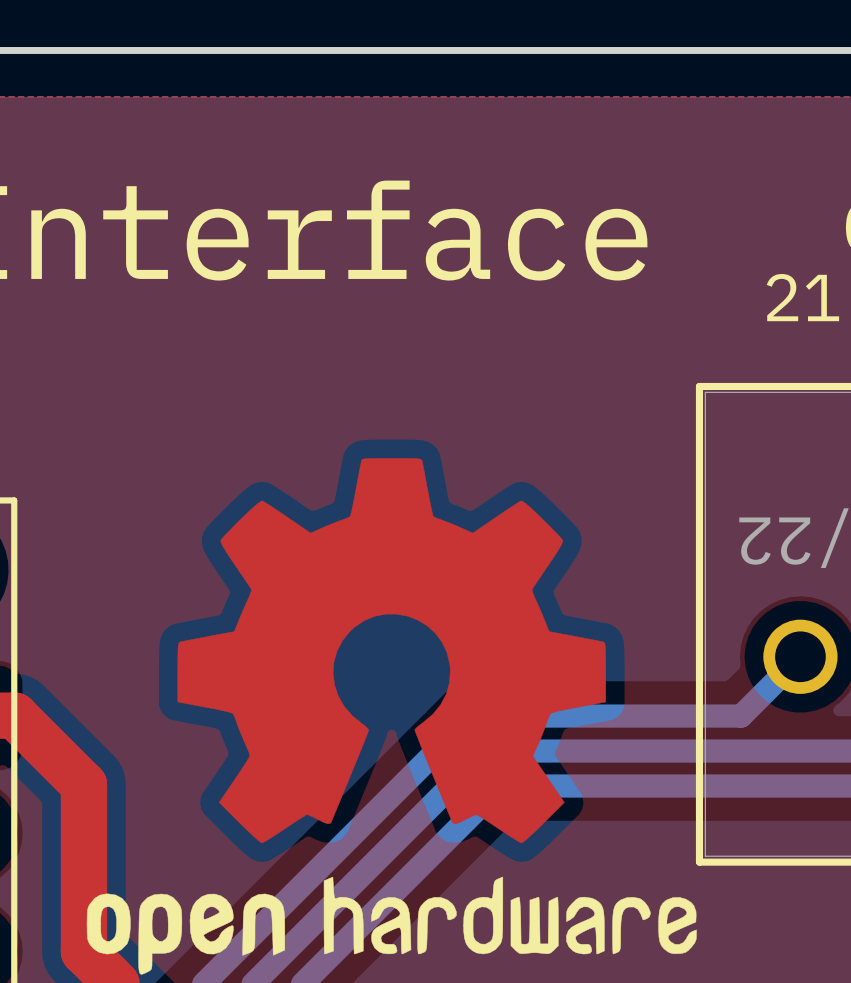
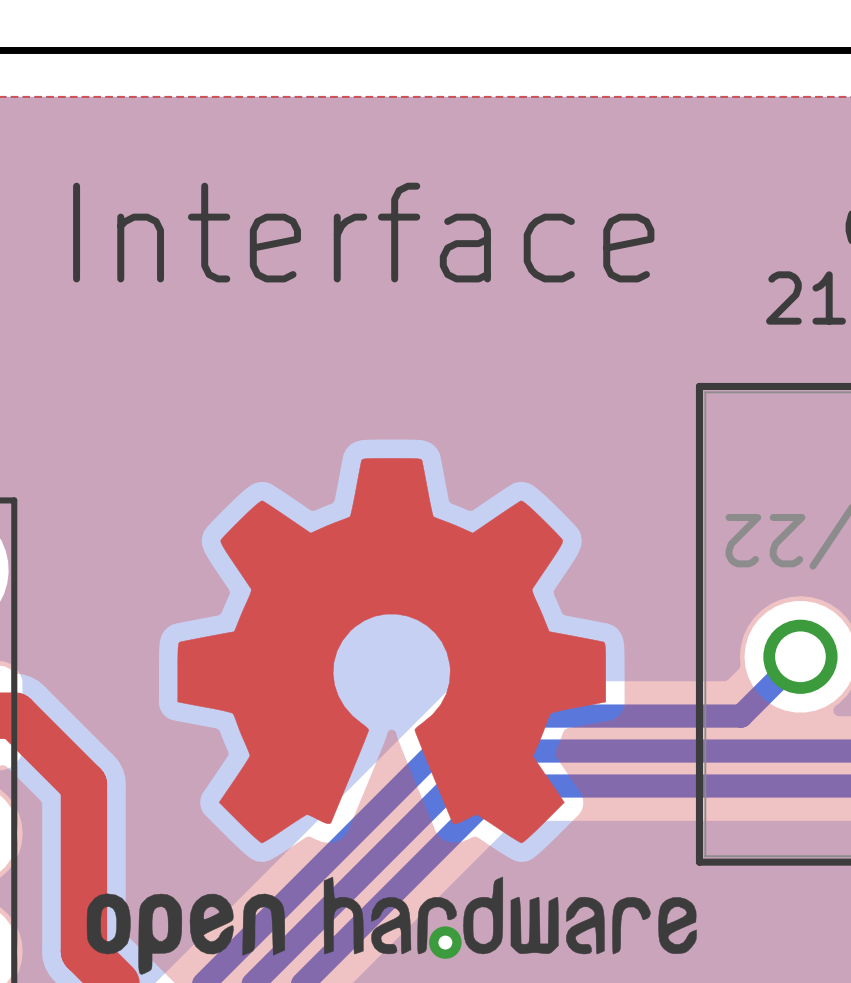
via: none -> (445, 942)

